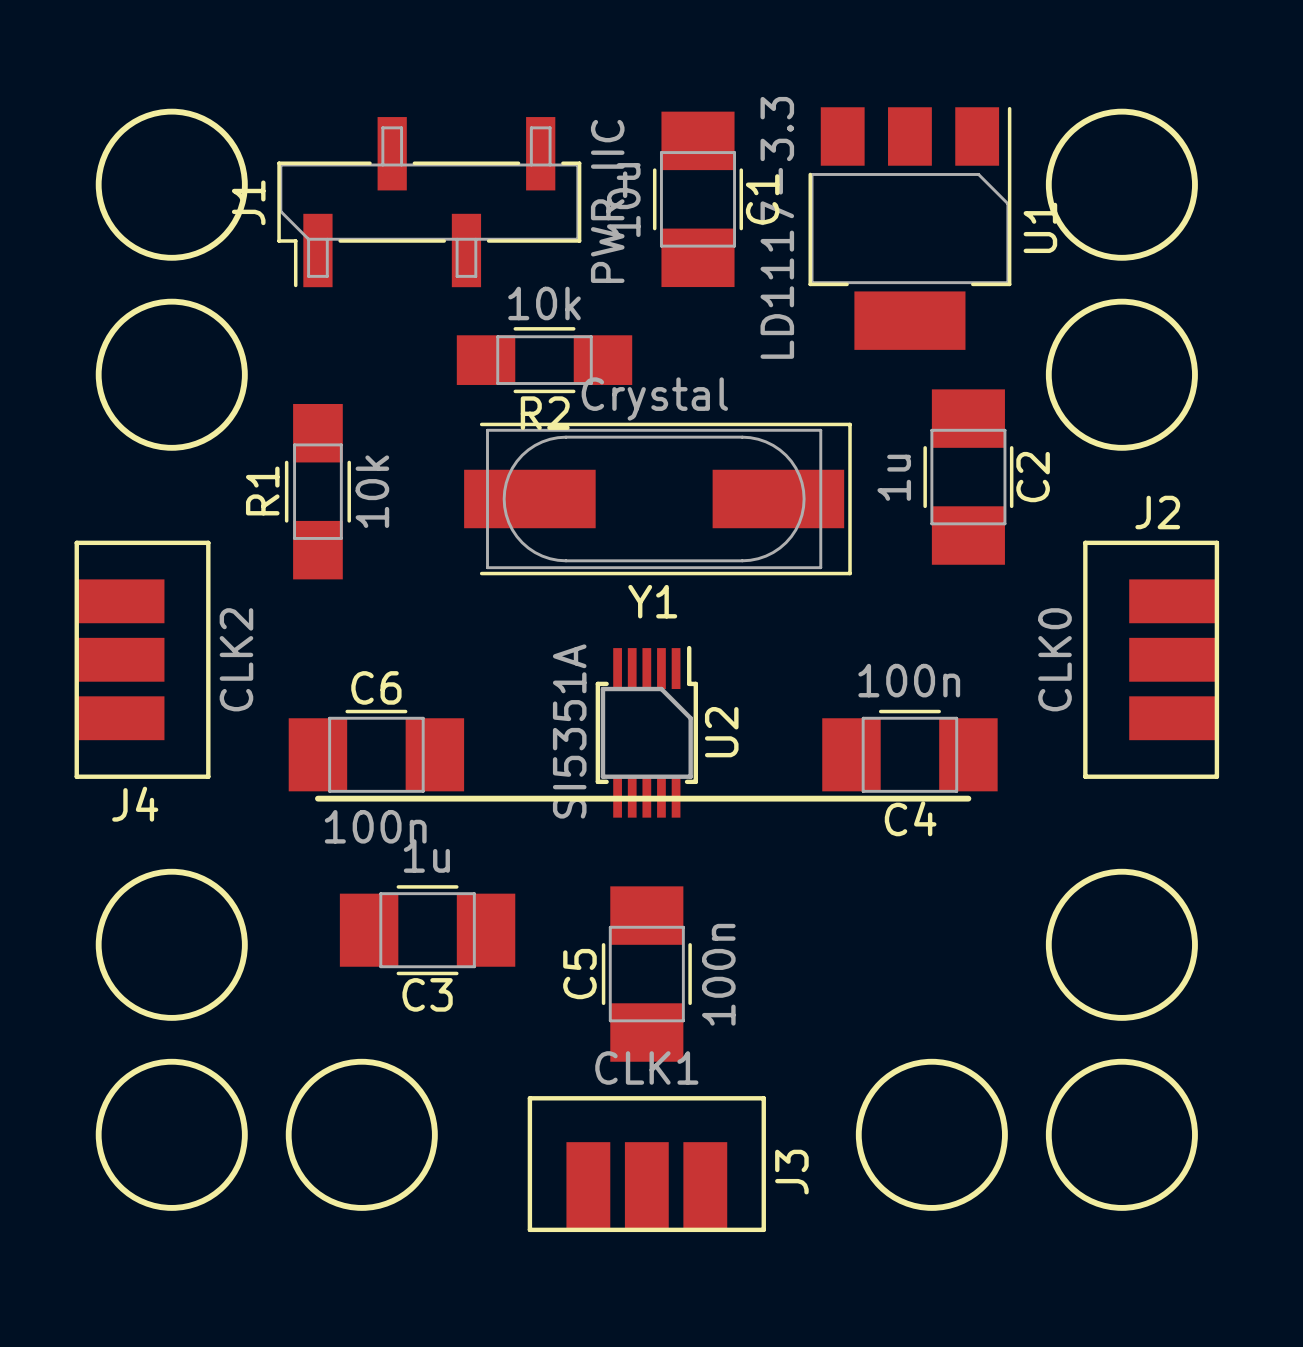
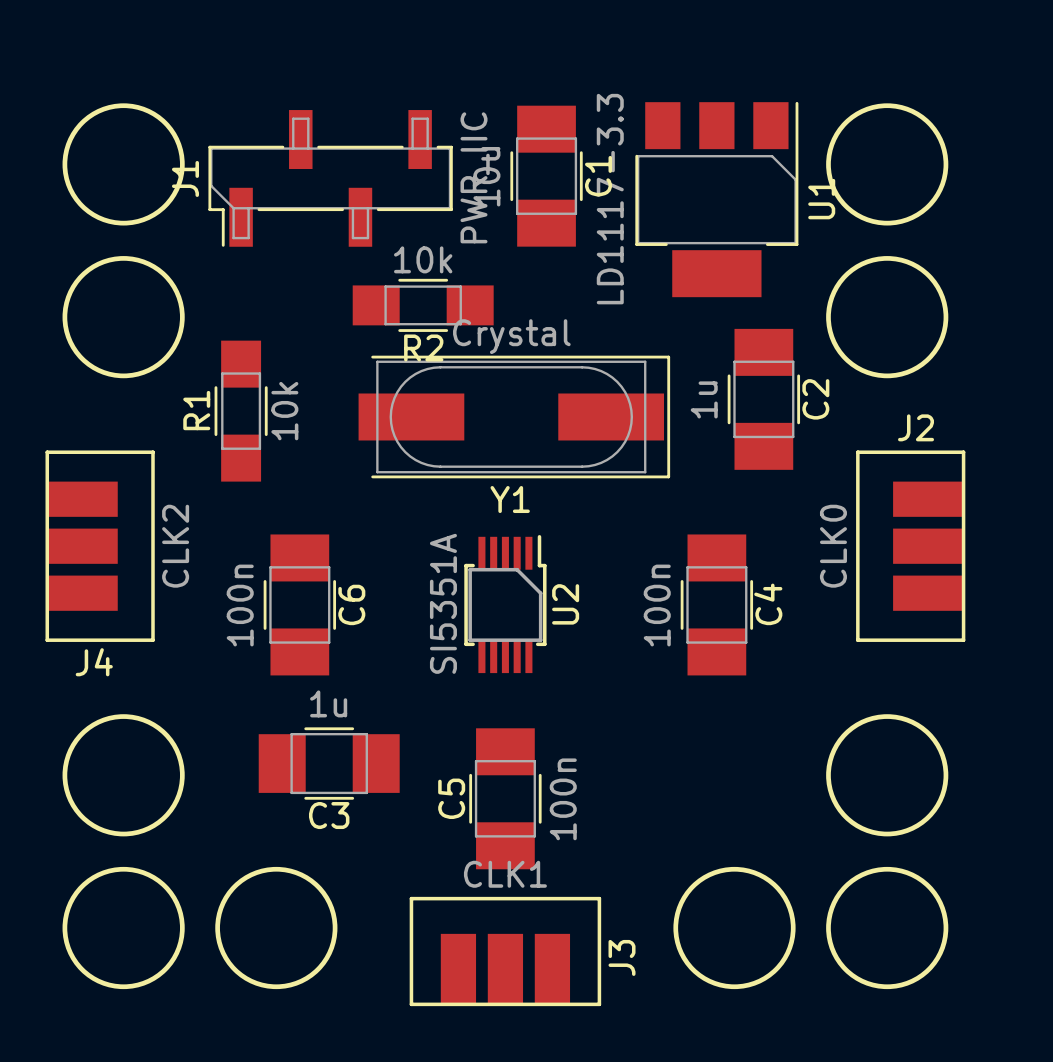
C4 value position: 100n (909, 680) -> 100n (657, 605)
C6 rotation: 0° (376, 754) -> 90° clockwise (299, 604)
C4 rotation: 0° (909, 754) -> 90° clockwise (716, 604)
line: (317, 798) (968, 798) -> none
C4 name position: C4 (910, 818) -> C4 (768, 604)

